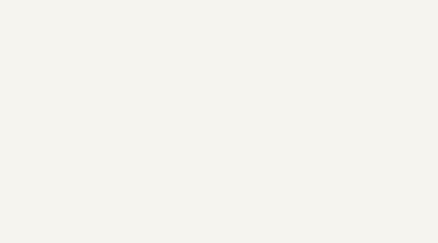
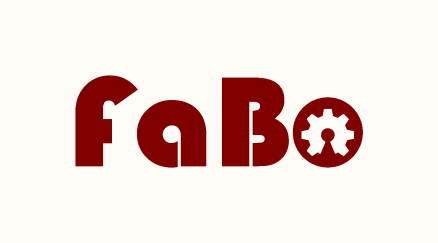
part: none -> (219, 121)

